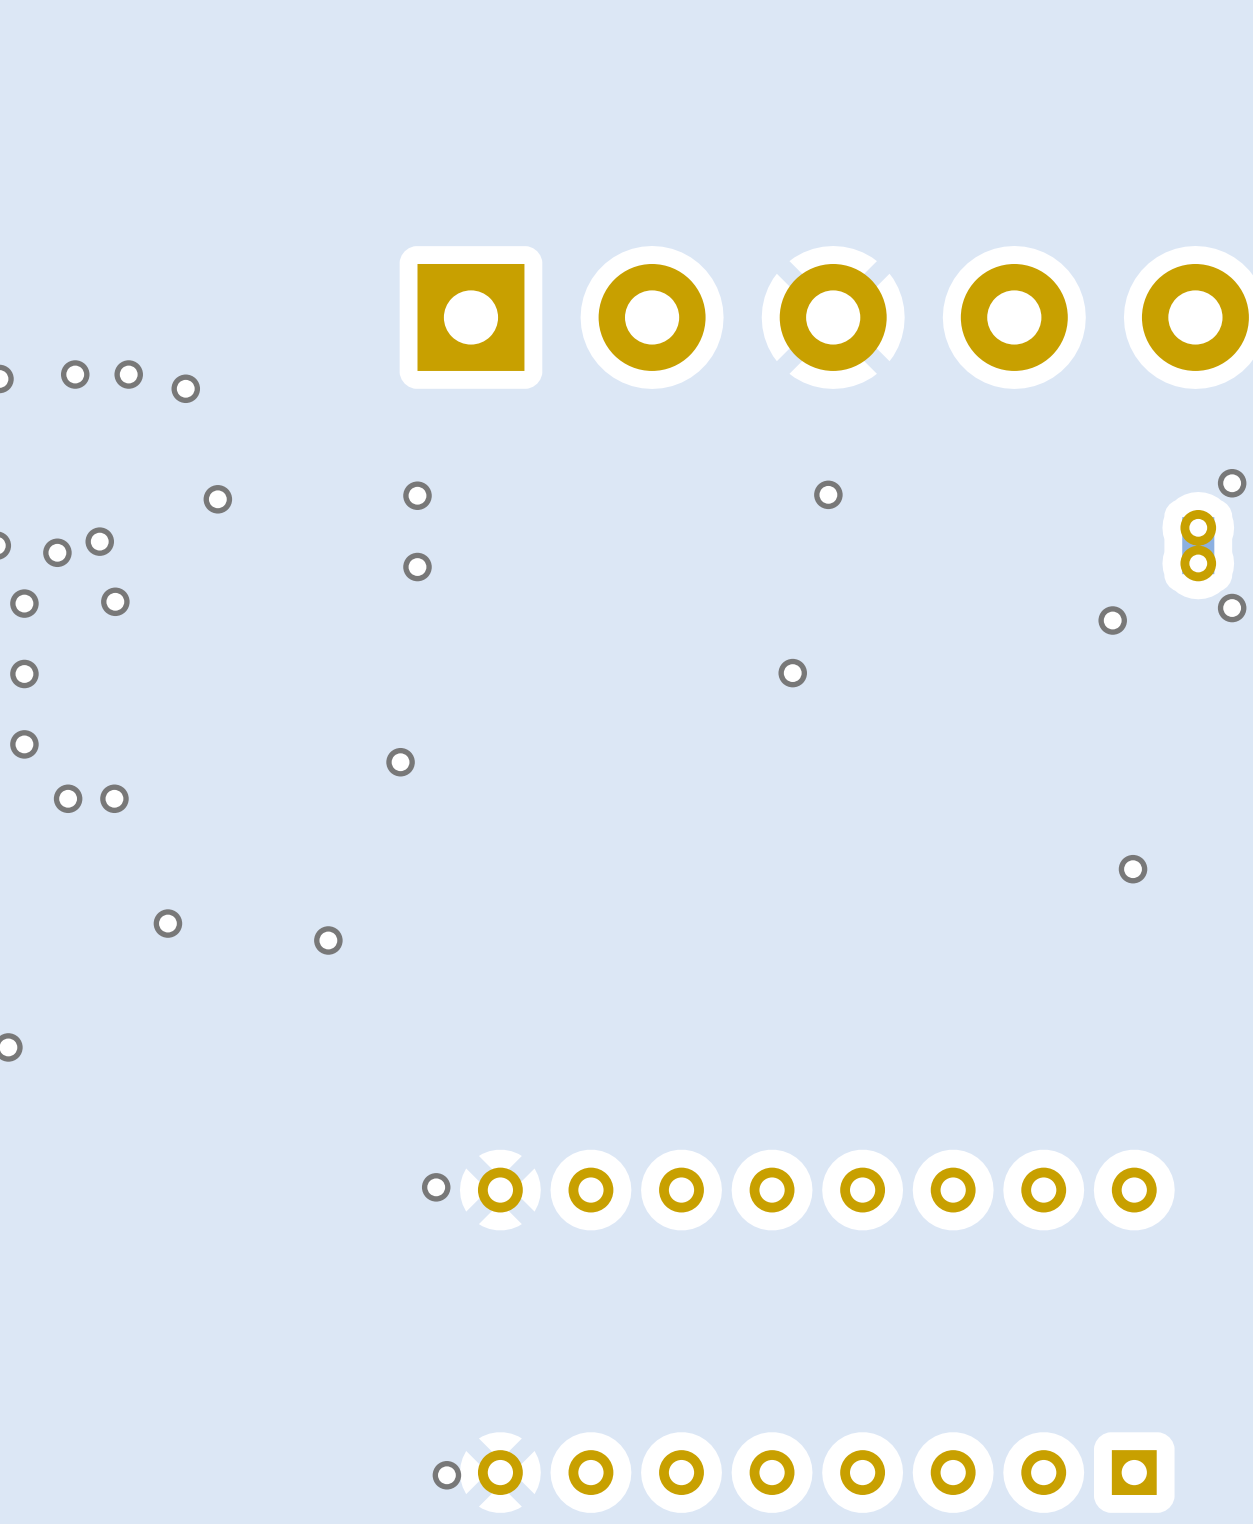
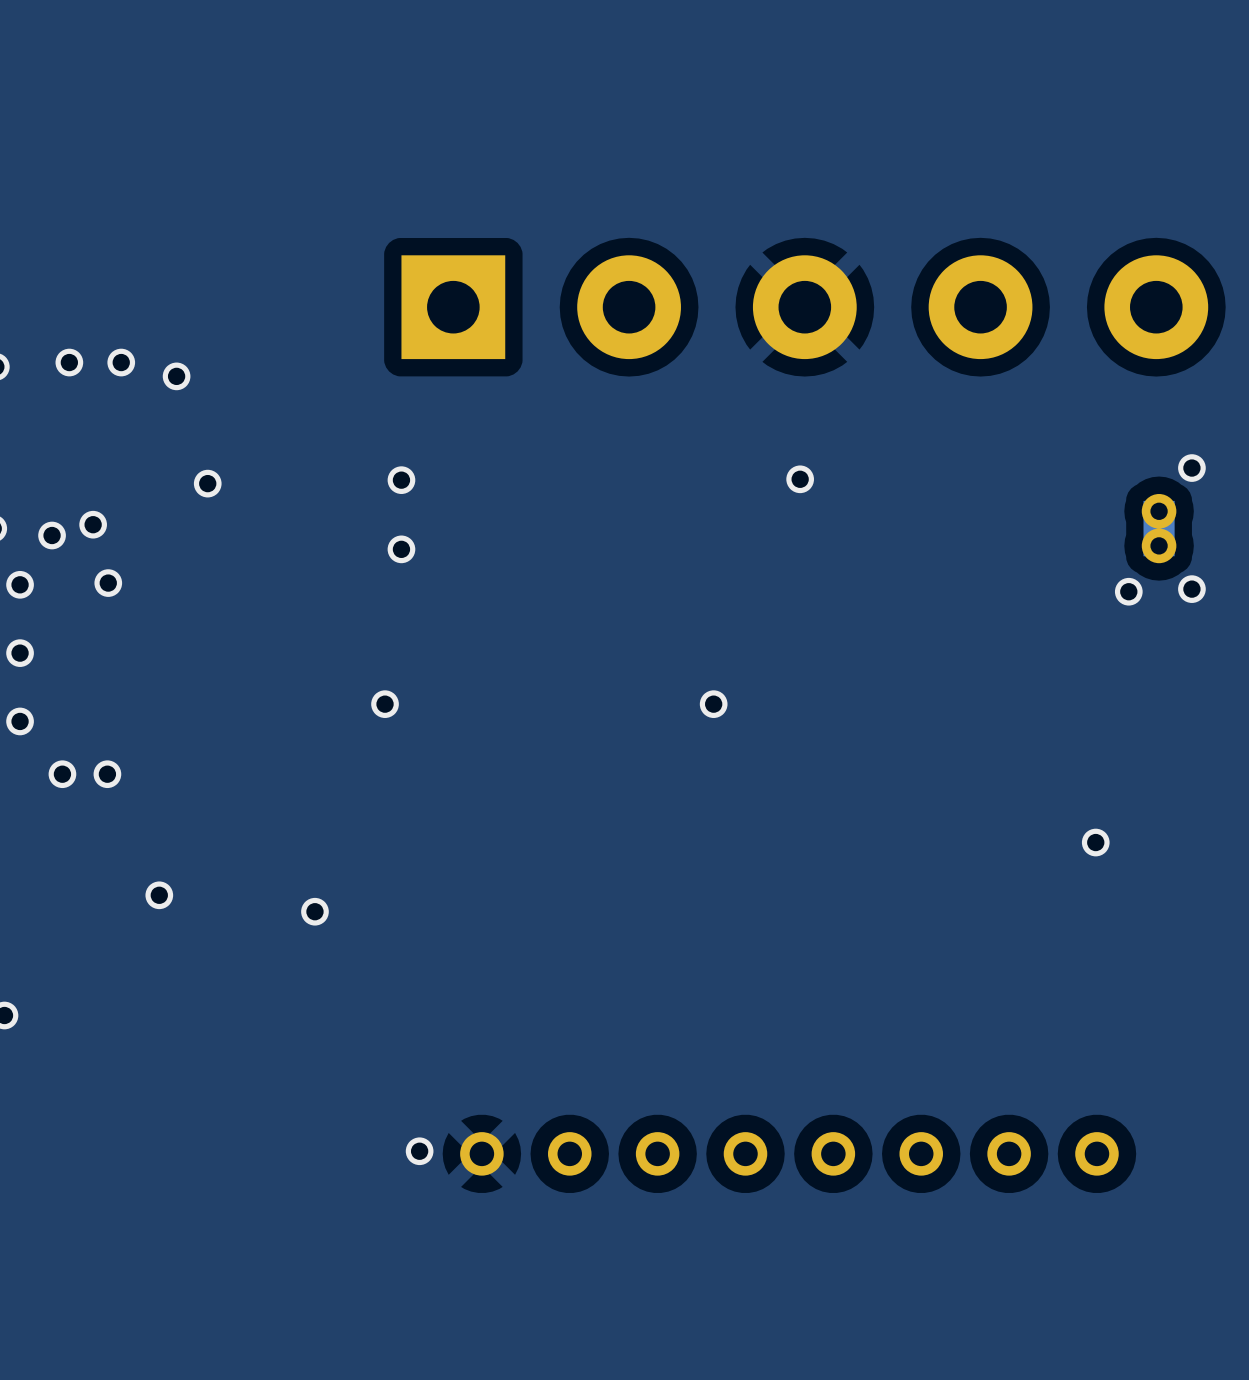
via position: (1112, 620) -> (1128, 591)
via position: (792, 673) -> (713, 704)
via position: (400, 762) -> (385, 704)

